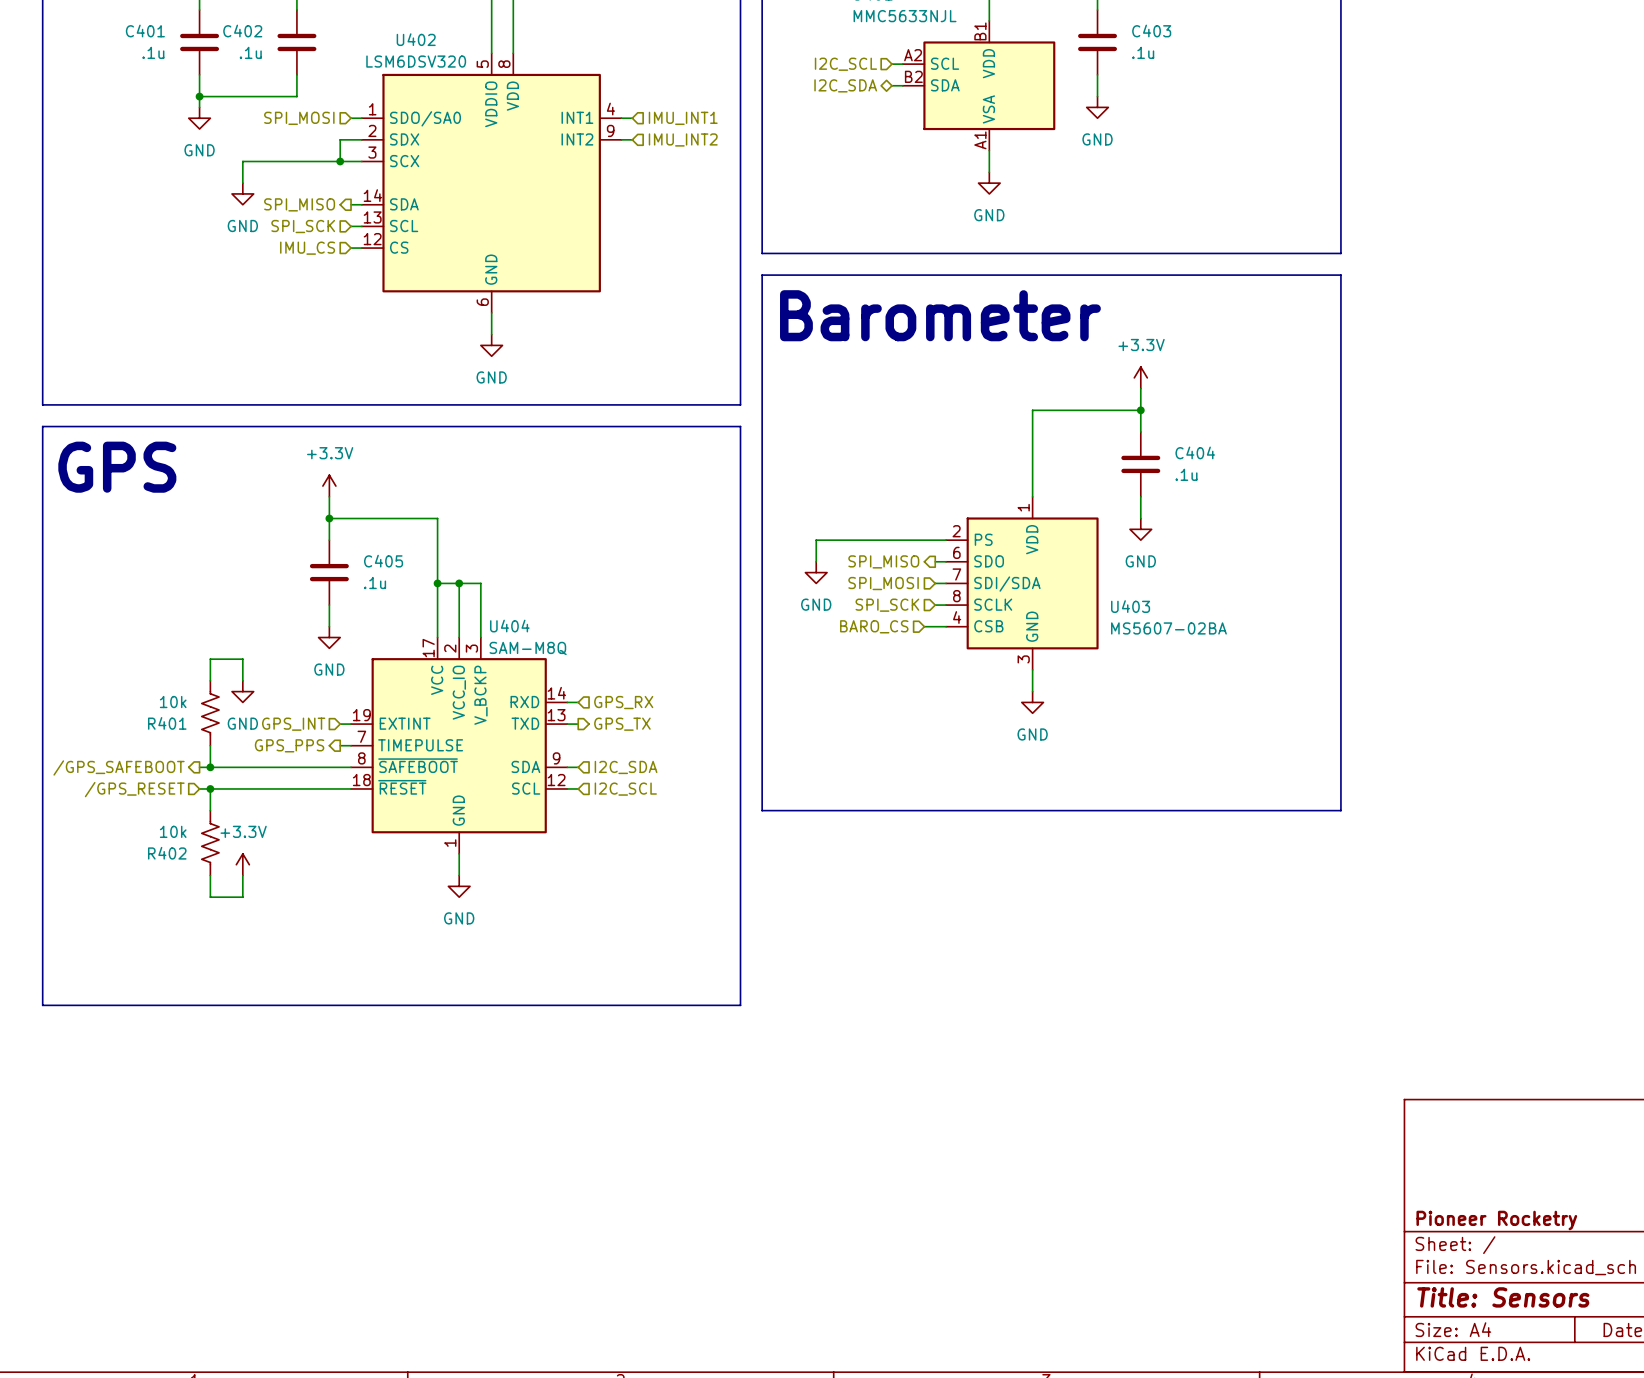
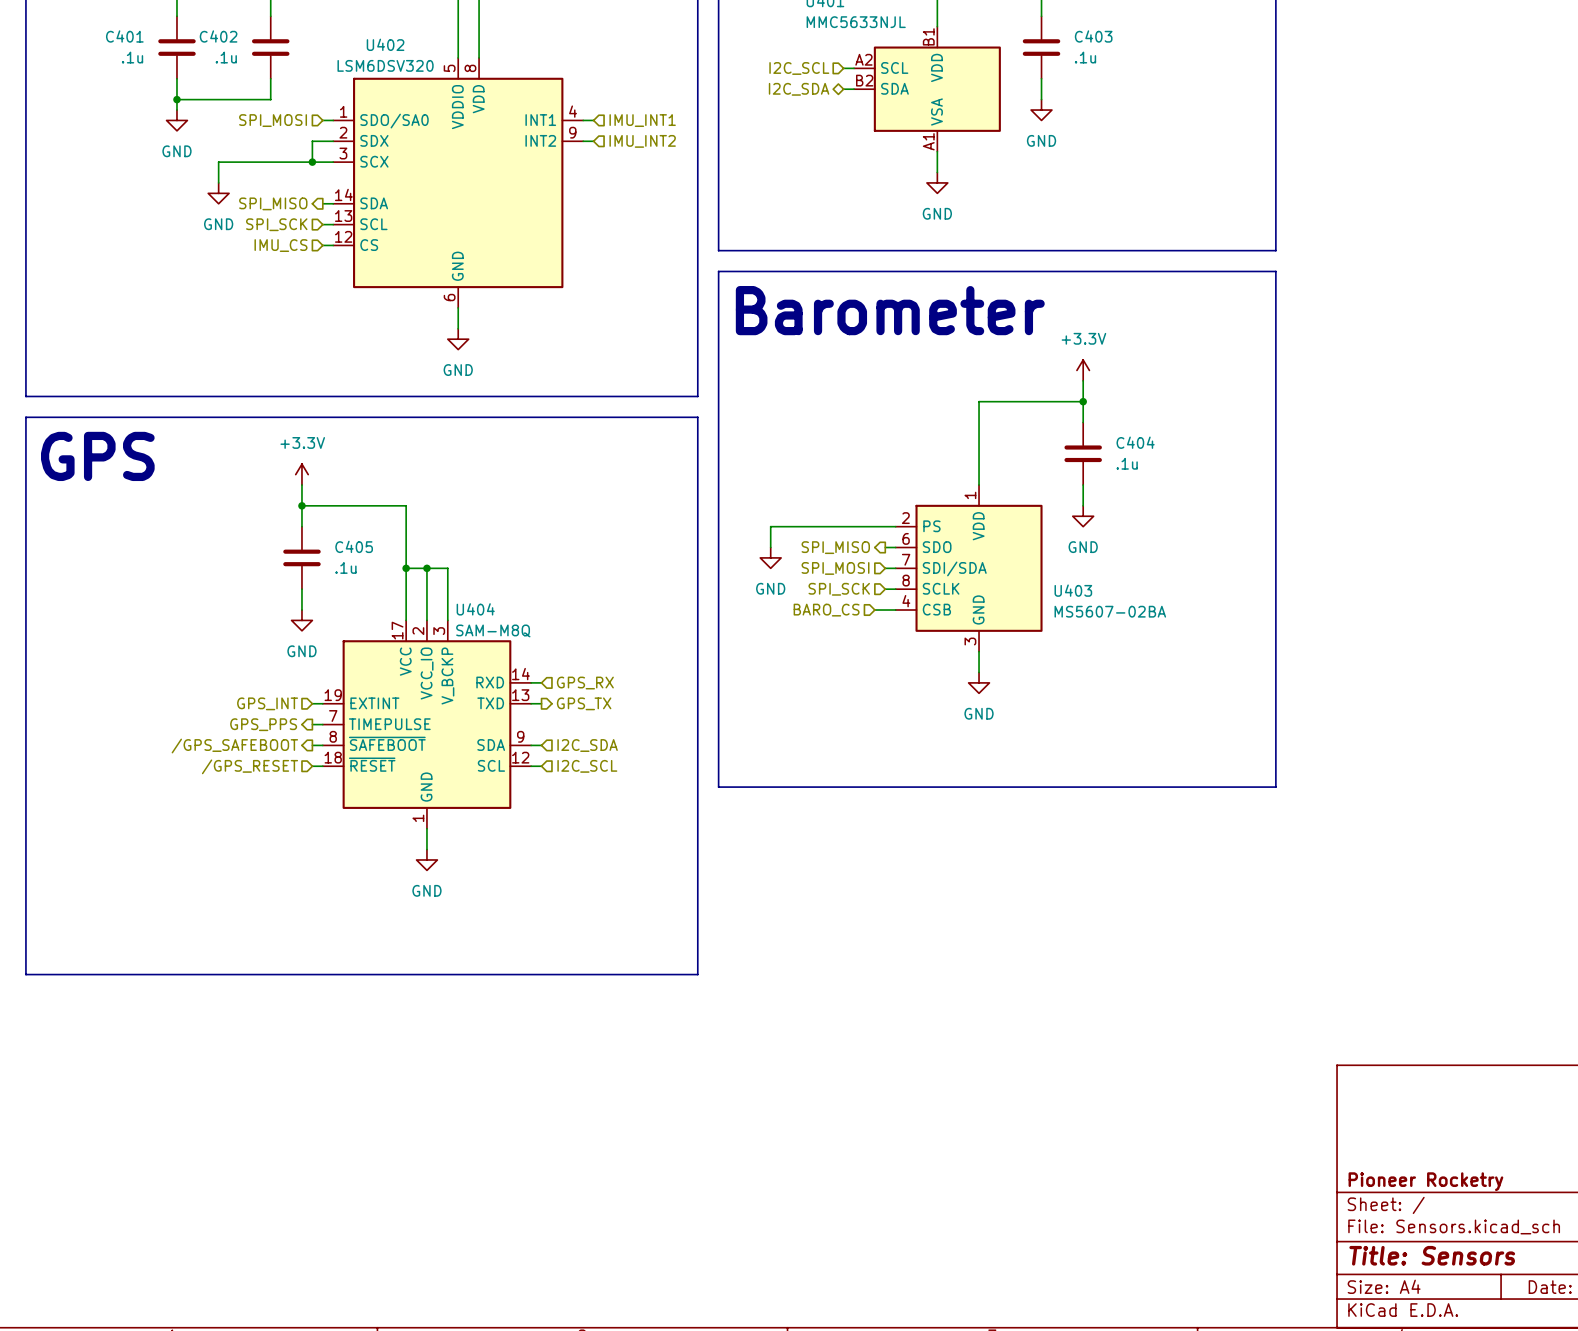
wire: (210, 680) (210, 659) (242, 659) (242, 680) -> none
power symbol: GND (242, 691) -> none
R401: 10k (210, 713) -> none
wire: (210, 745) (210, 767) -> none
hierarchical label position: /GPS_SAFEBOOT (119, 767) -> /GPS_SAFEBOOT (234, 746)
wire: (199, 767) (340, 767) -> none
junction: (210, 767) -> none
wire: (199, 788) (340, 788) -> none
wire: (210, 788) (210, 810) -> none
junction: (210, 788) -> none
hierarchical label position: /GPS_RESET (134, 789) -> /GPS_RESET (249, 766)
R402: 10k (210, 843) -> none
power symbol: +3.3V (242, 864) -> none
wire: (210, 875) (210, 897) (242, 897) (242, 875) -> none

